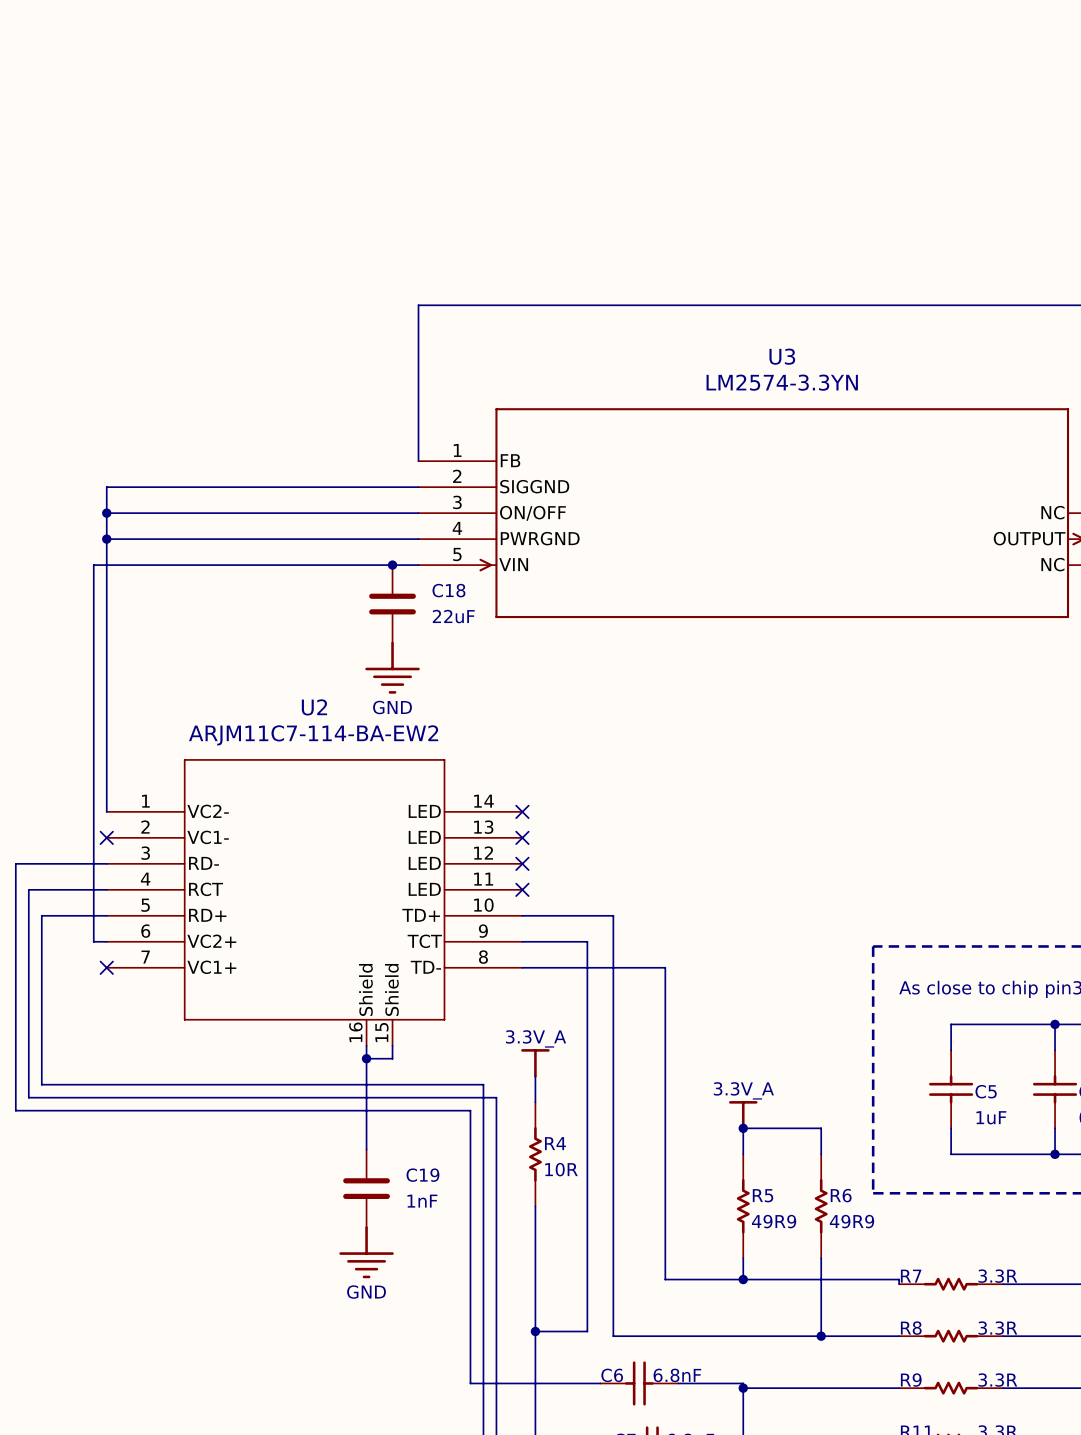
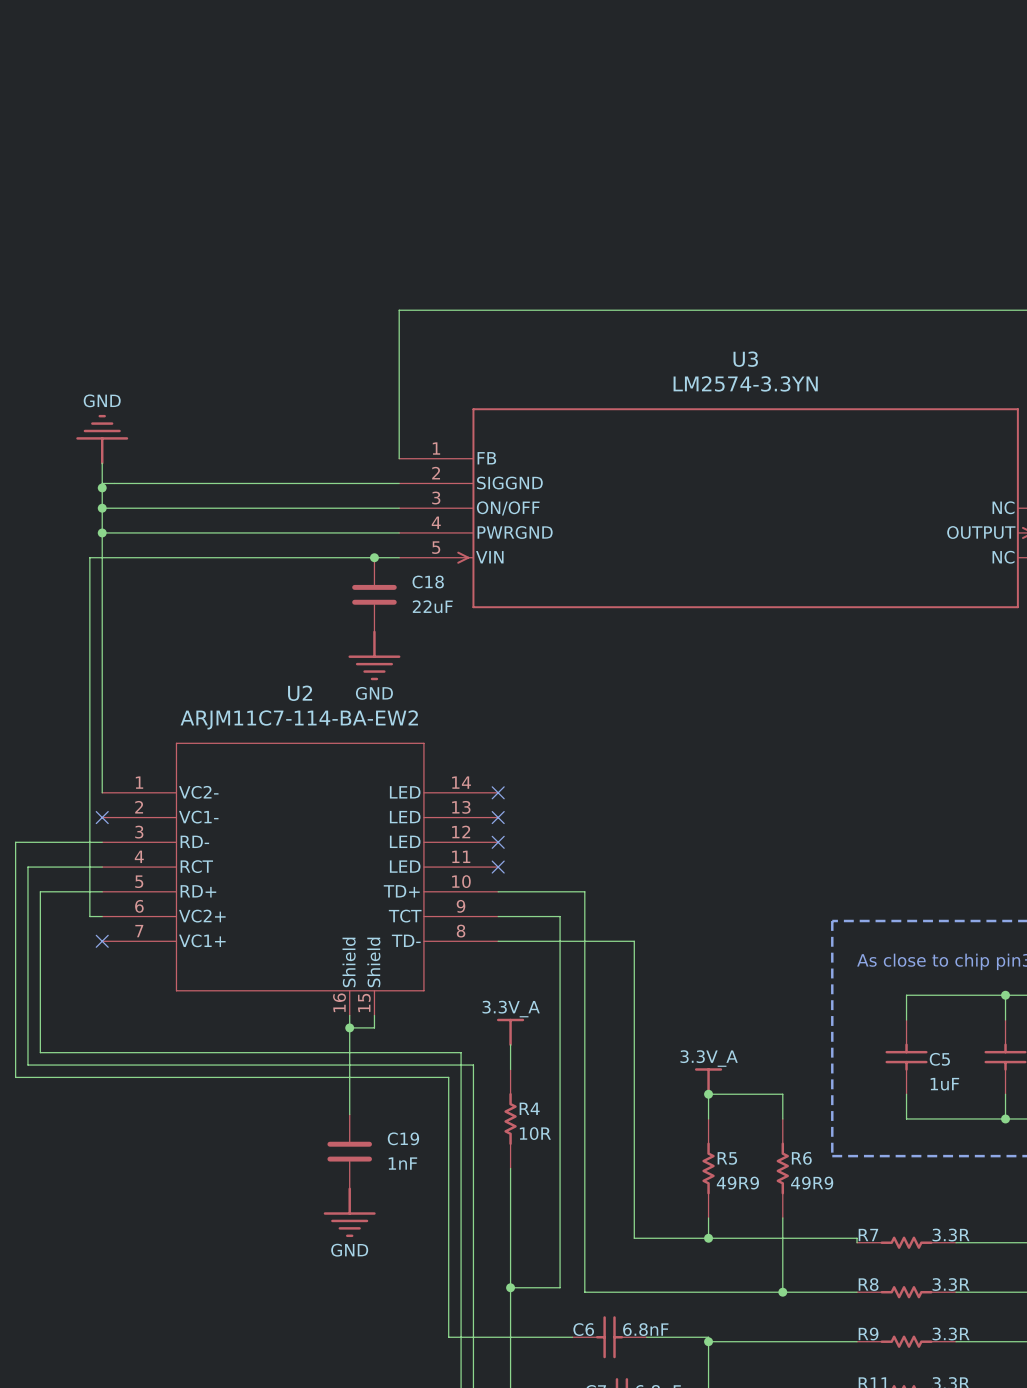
power symbol: none -> GND (102, 439)
wire: none -> (102, 463) (102, 483)
junction: none -> (102, 487)

